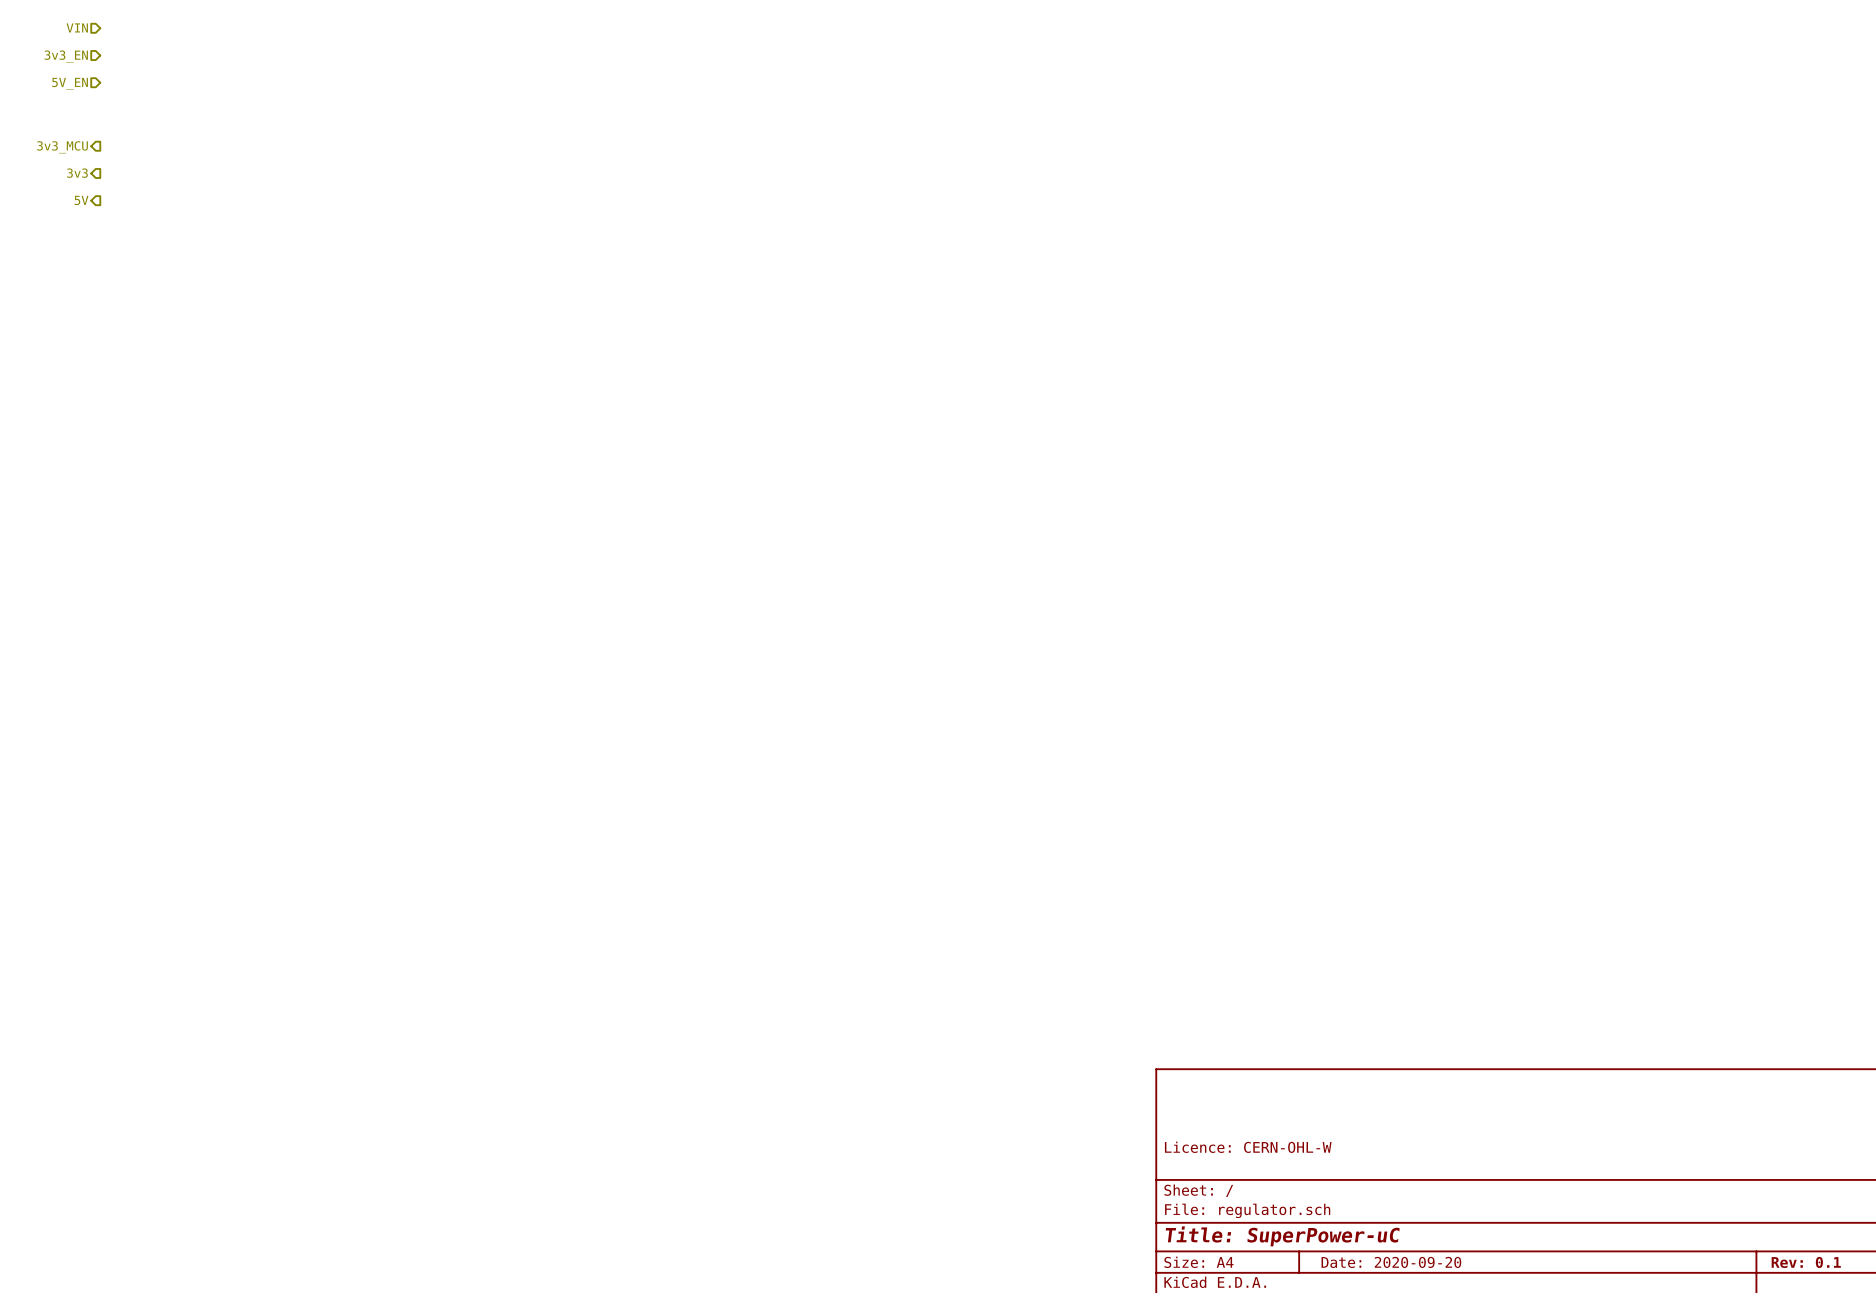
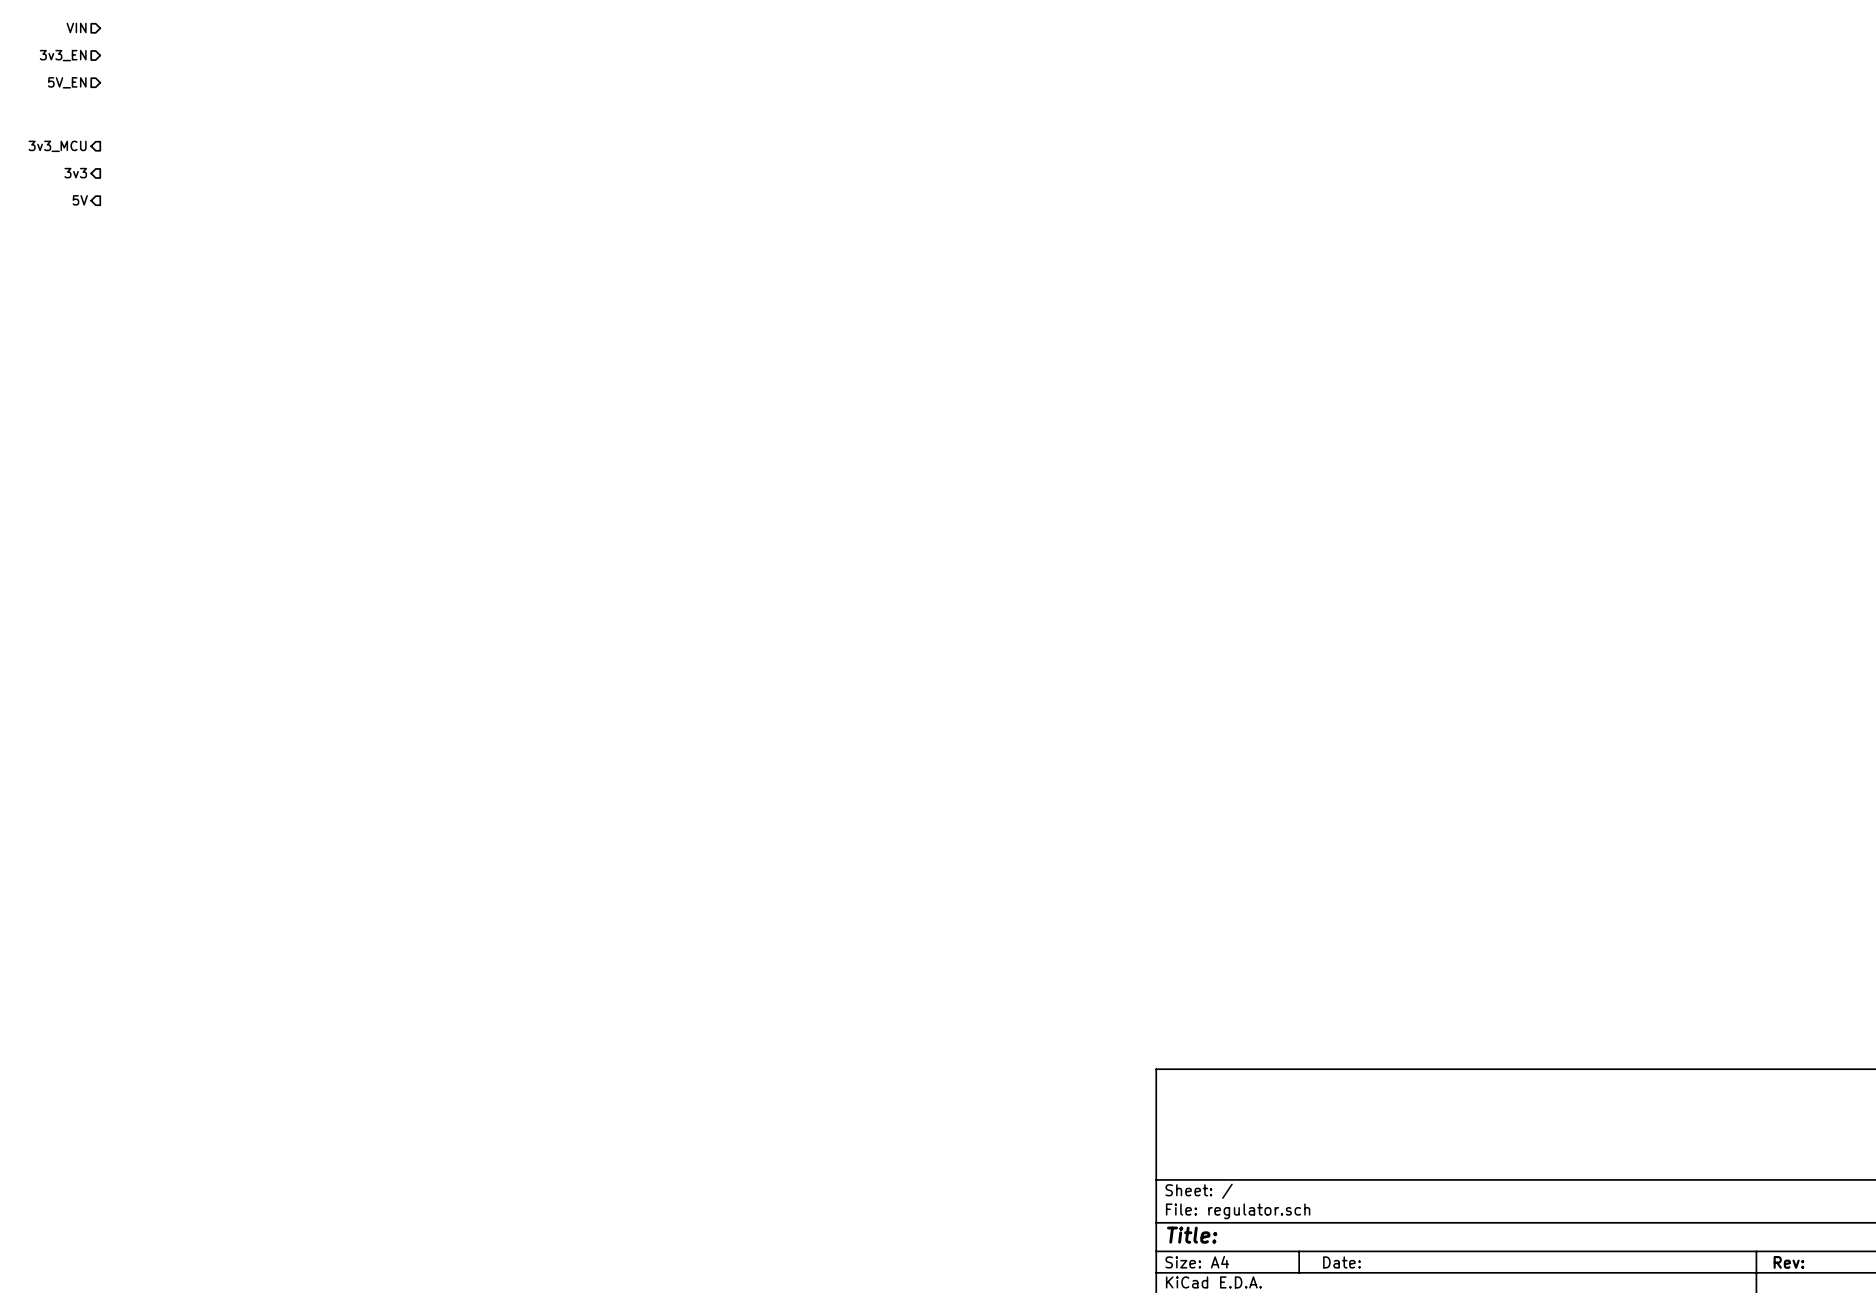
title block: Licence: CERN-OHL-W (1248, 1147) -> none
title block: Title: SuperPower-uC (1282, 1236) -> Title: (1192, 1235)
title block: Date: 2020-09-20 (1391, 1262) -> Date: (1341, 1262)
title block: Rev: 0.1 (1806, 1262) -> Rev: (1788, 1262)

